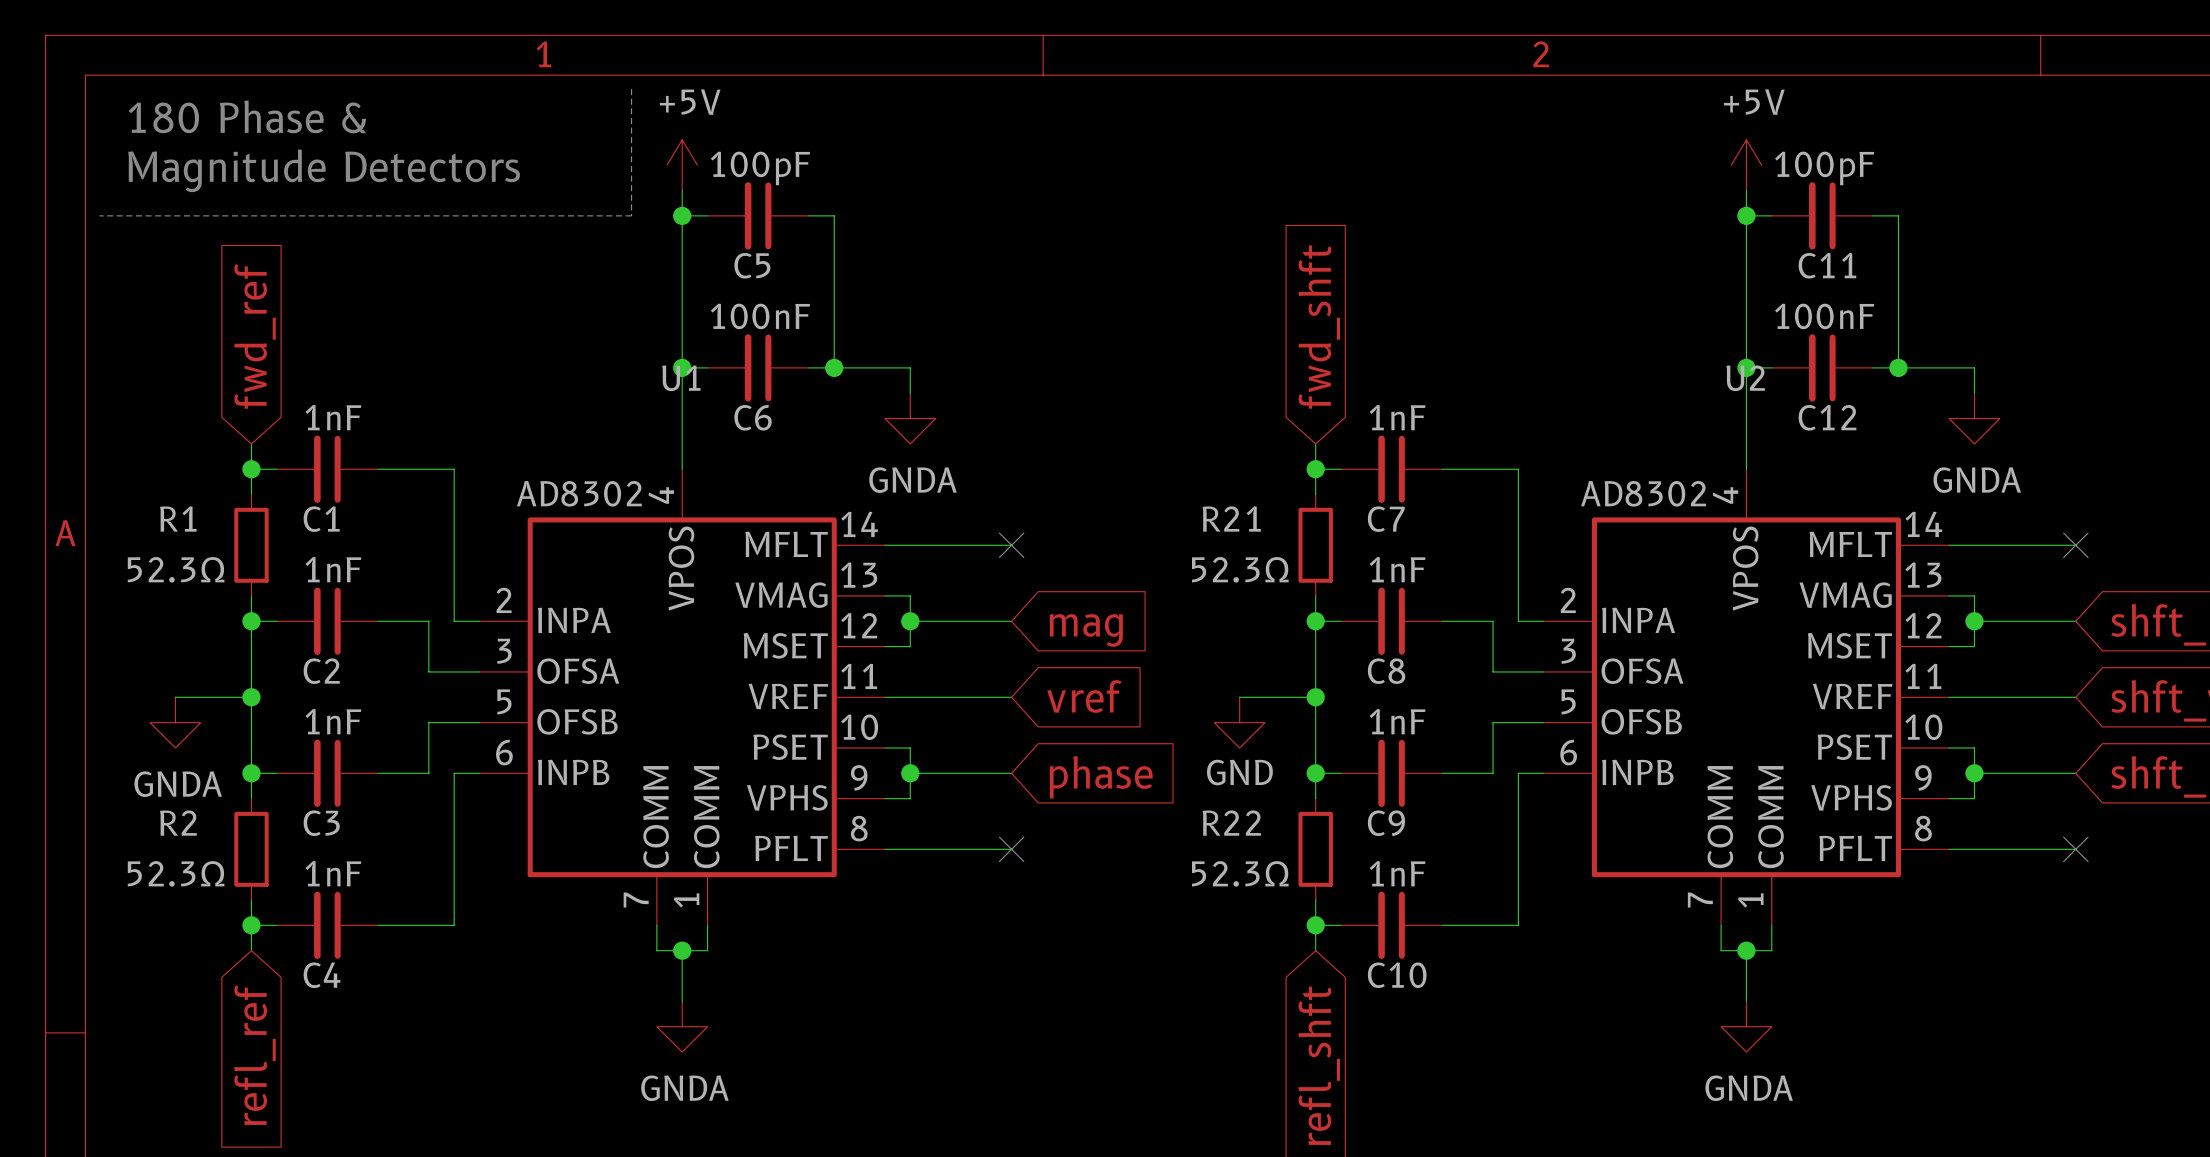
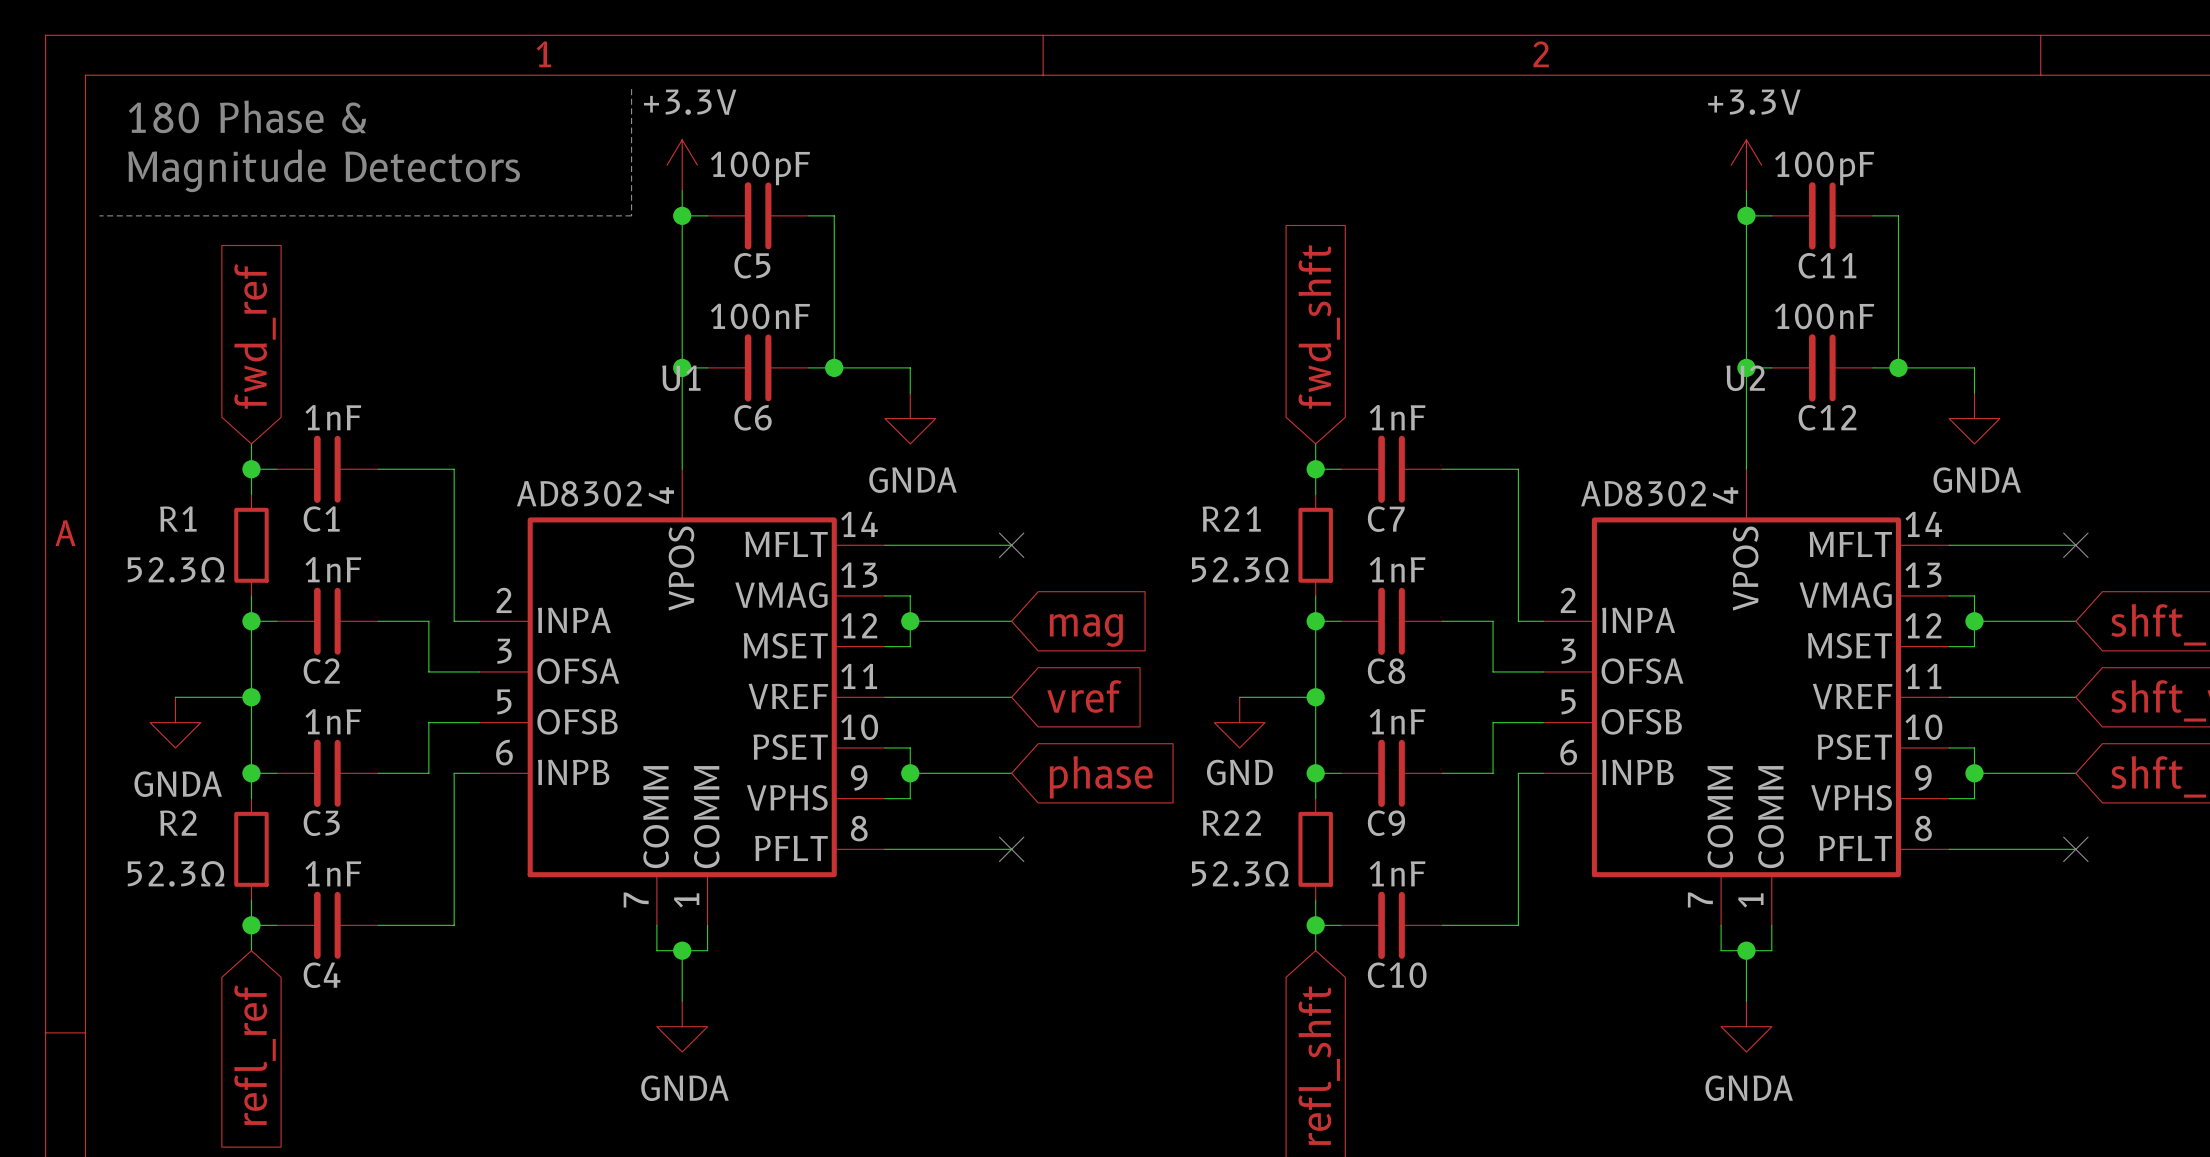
power symbol: +5V (682, 165) -> +3.3V (682, 165)
power symbol: +5V (1746, 165) -> +3.3V (1746, 165)

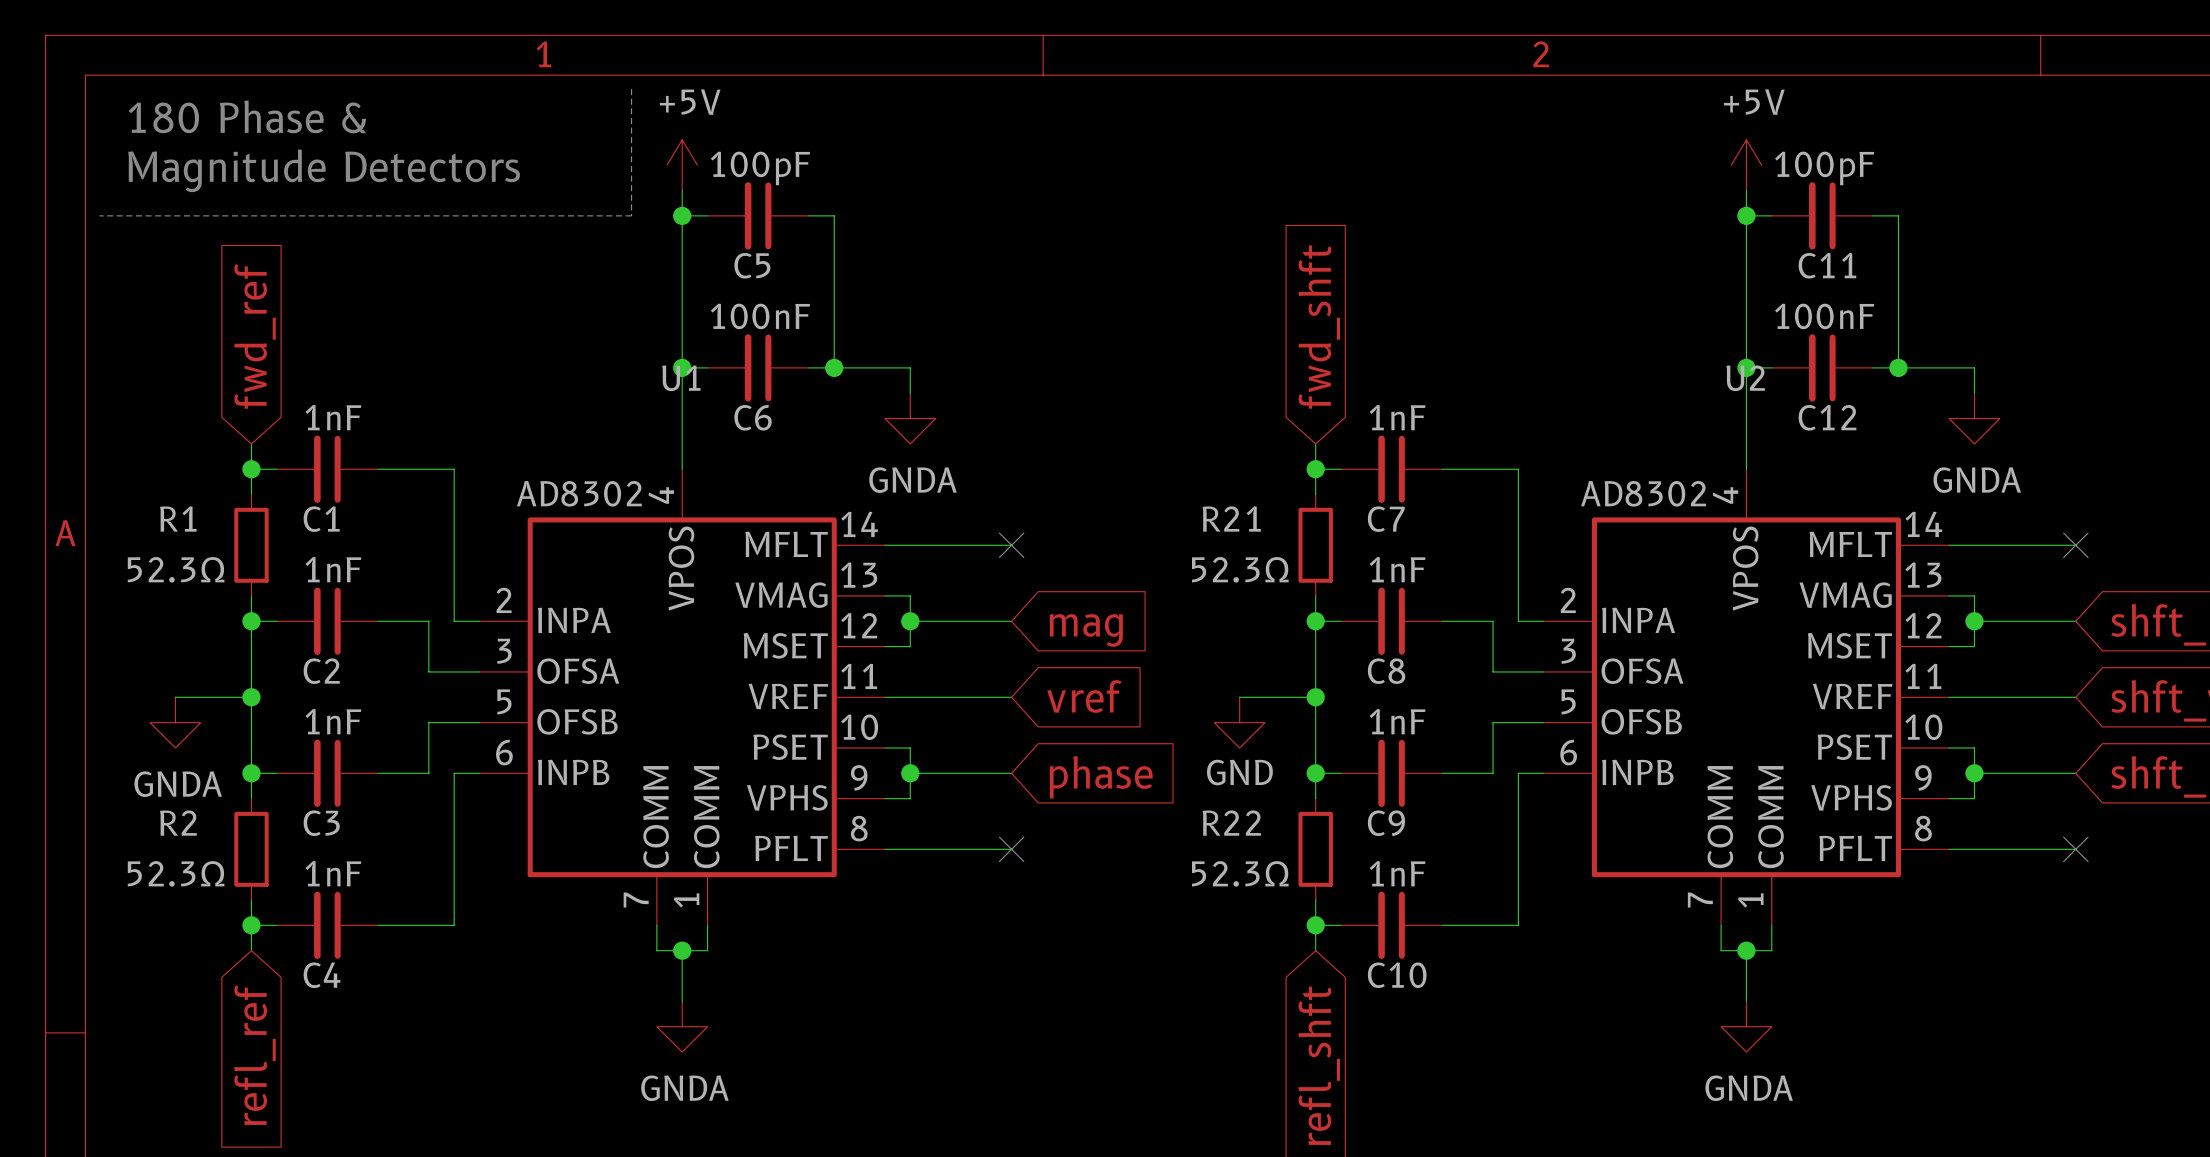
power symbol: +3.3V (682, 165) -> +5V (682, 165)
power symbol: +3.3V (1746, 165) -> +5V (1746, 165)

